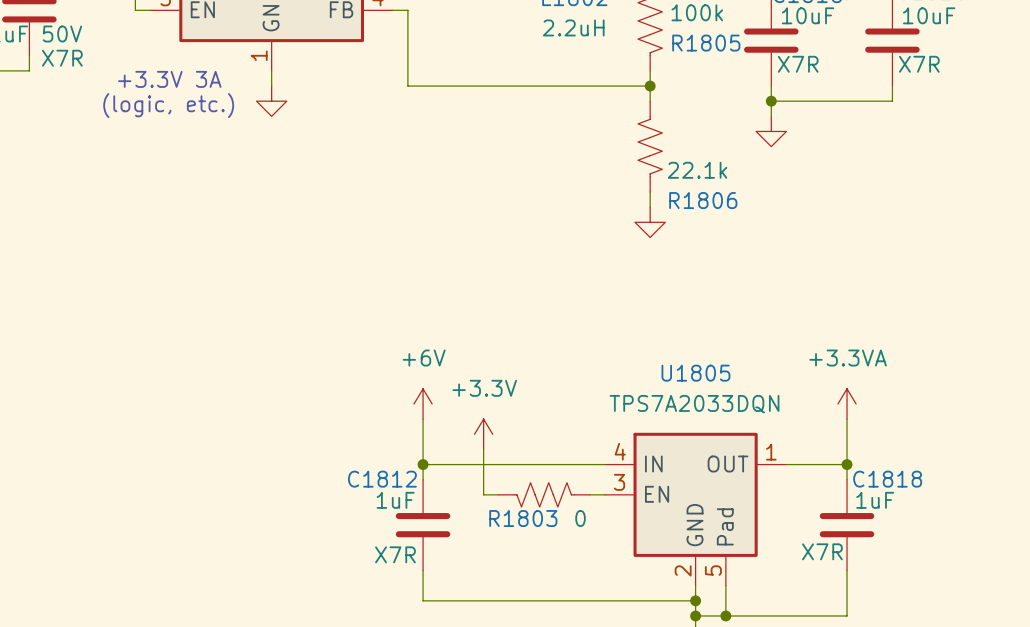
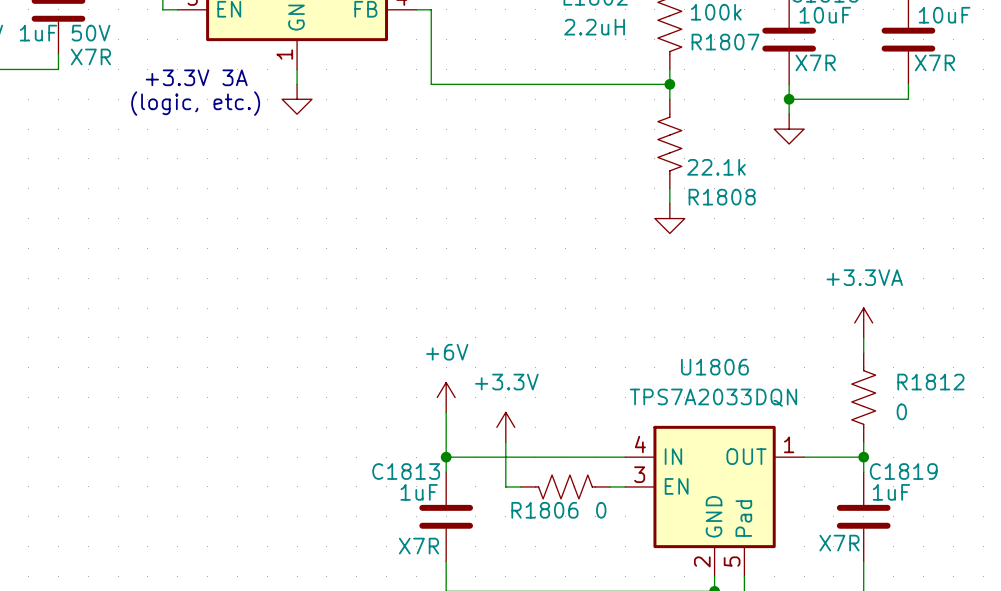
R1805 name: R1805 (706, 43) -> R1807 (725, 42)
R1806 name: R1806 (703, 200) -> R1808 (722, 197)
wire: none -> (863, 337) (863, 352)
U1805 name: U1805 (695, 373) -> U1806 (714, 367)
R1812: none -> 0 (863, 397)
power symbol position: +3.3VA (847, 404) -> +3.3VA (863, 322)
C1812 name: C1812 (382, 479) -> C1813 (406, 471)
C1818 name: C1818 (887, 479) -> C1819 (903, 471)
R1803 name: R1803 (523, 518) -> R1806 (544, 510)

